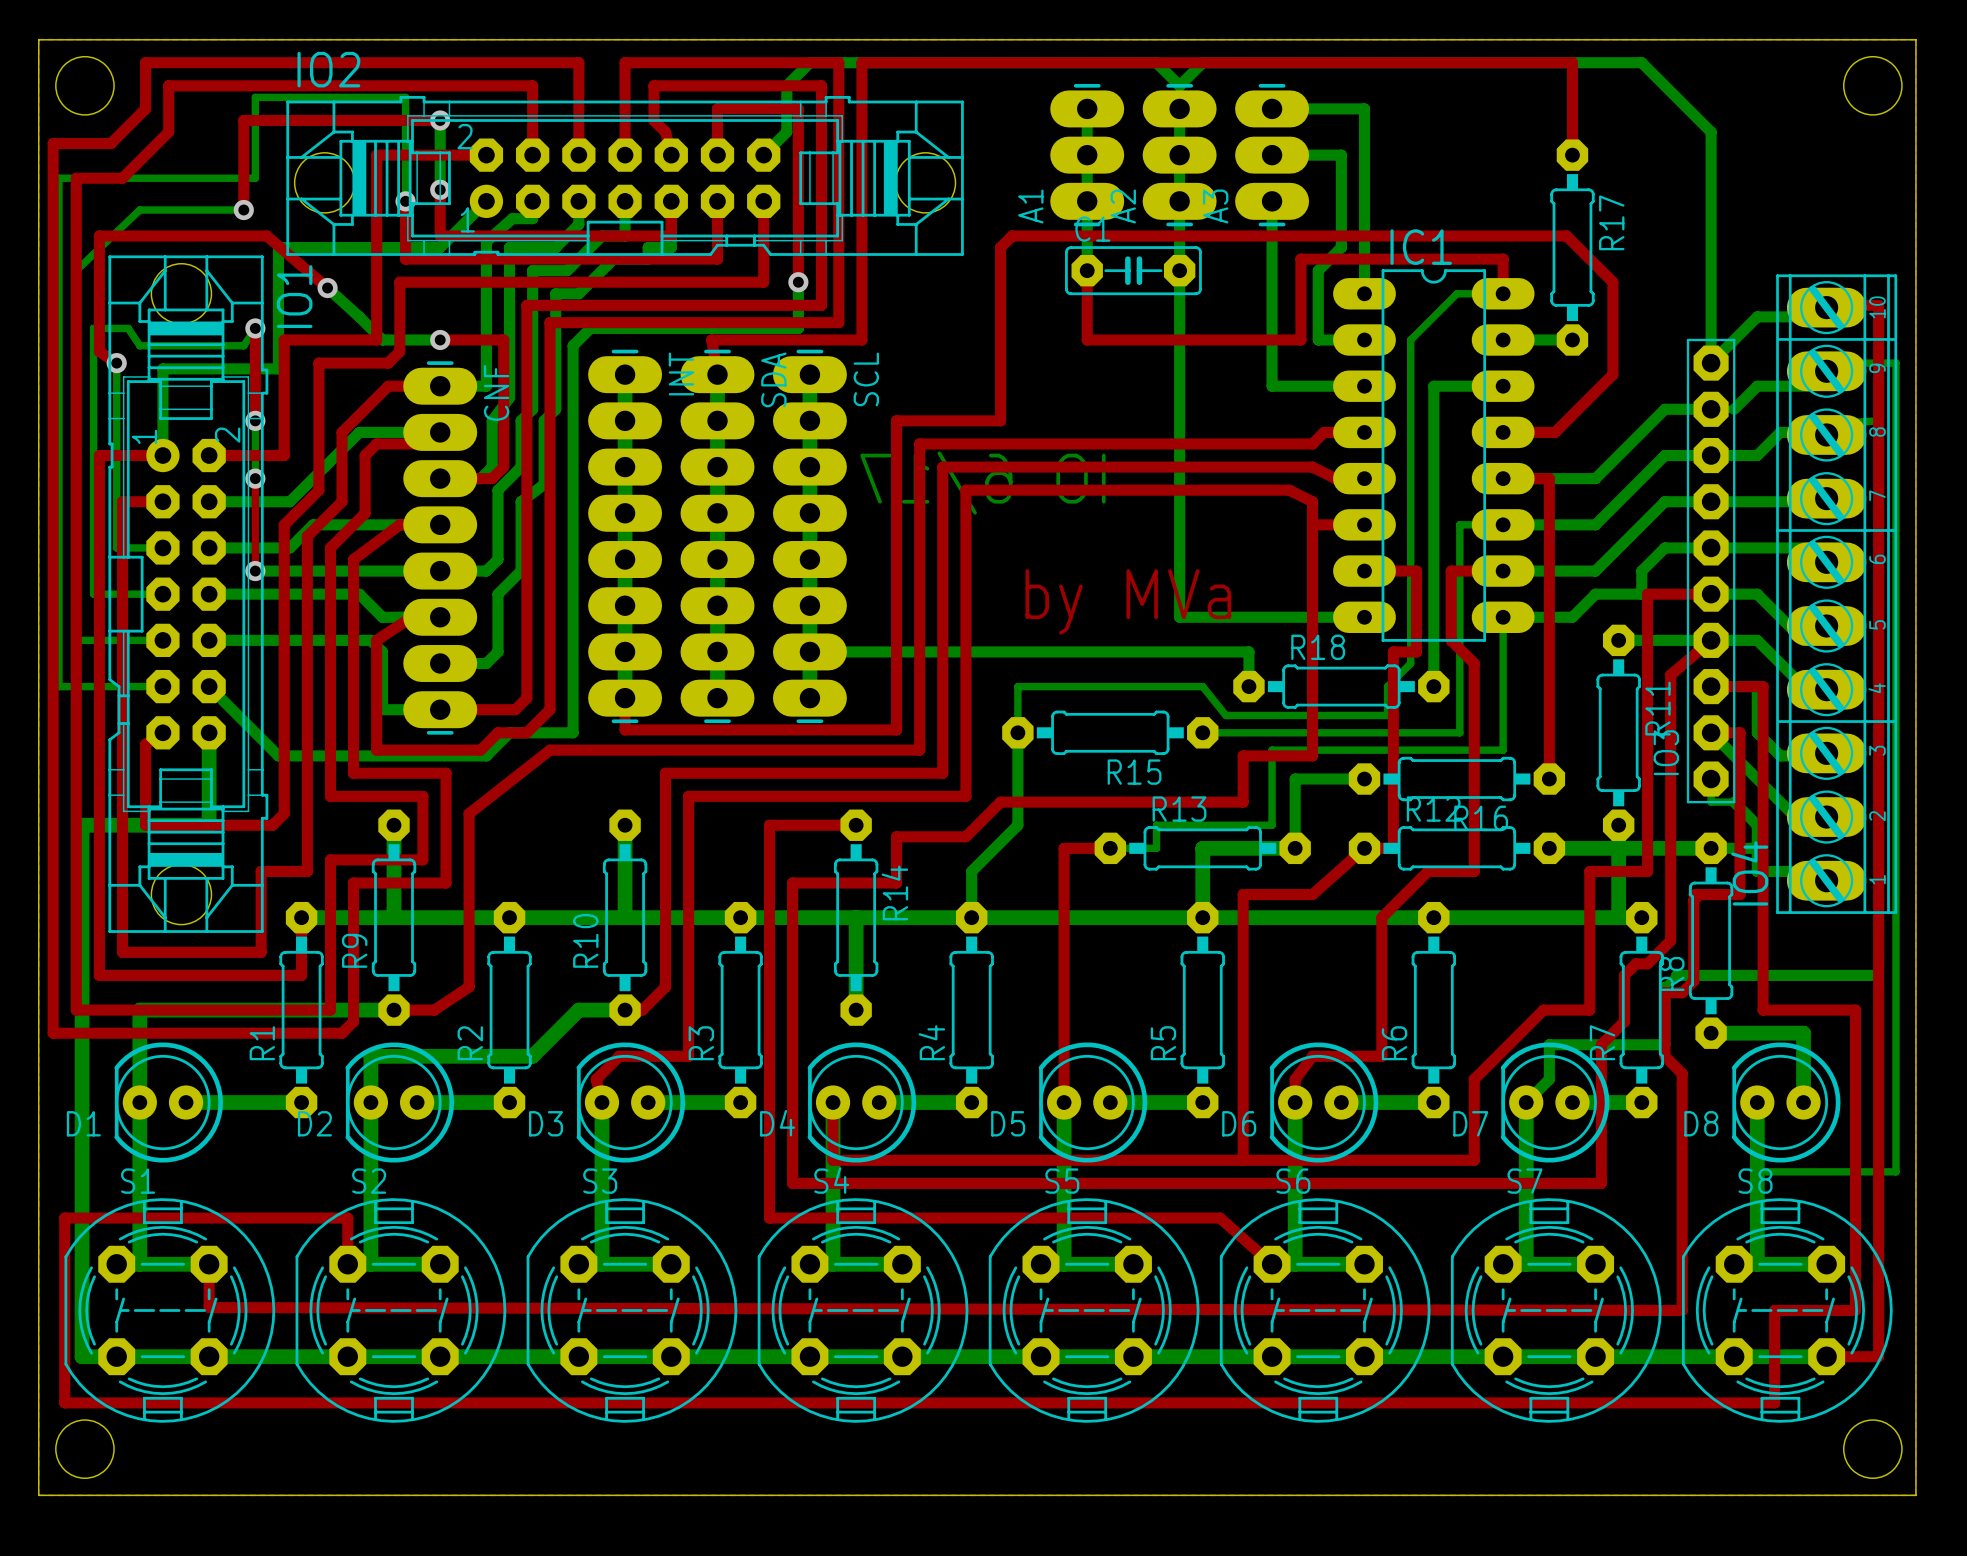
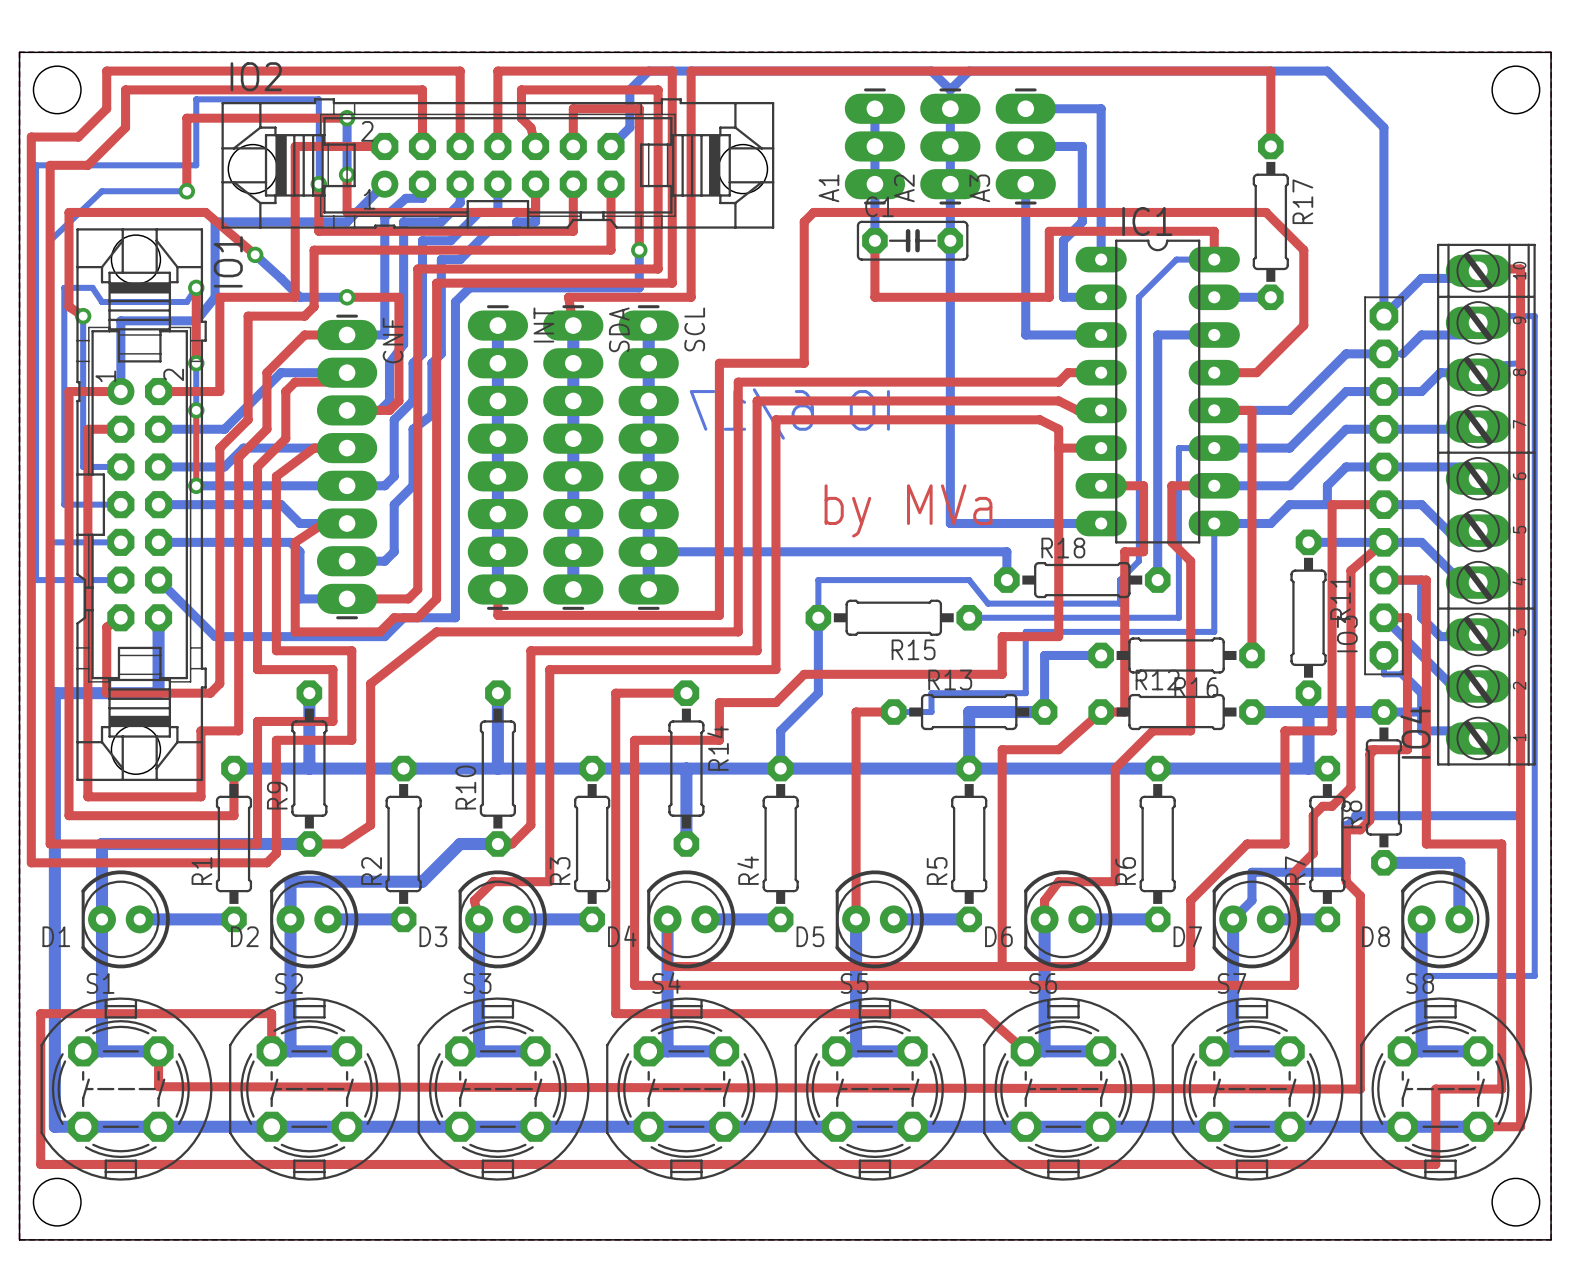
bottom track: (278, 339) (278, 368) (255, 368) -> (215, 297) (196, 320)

